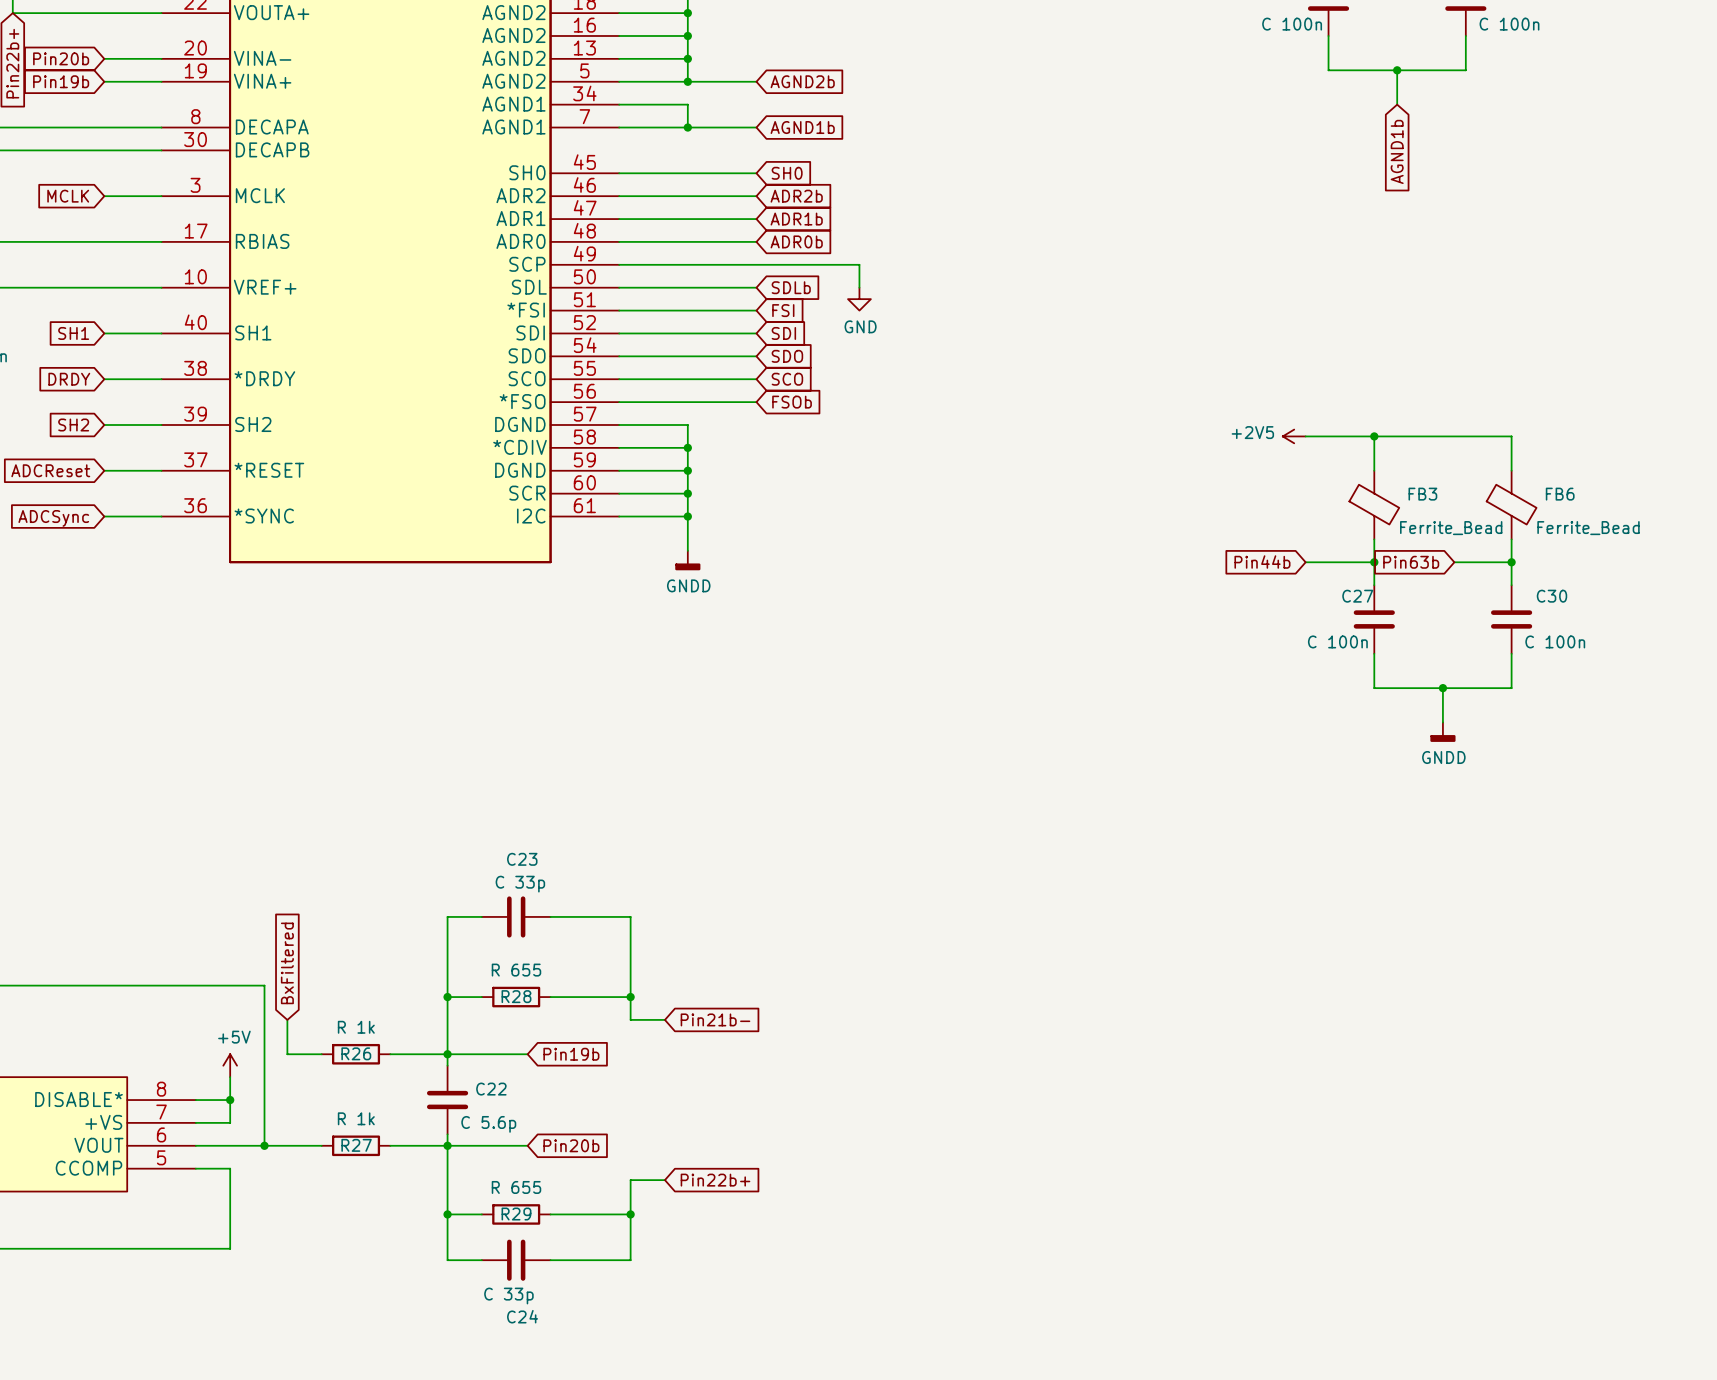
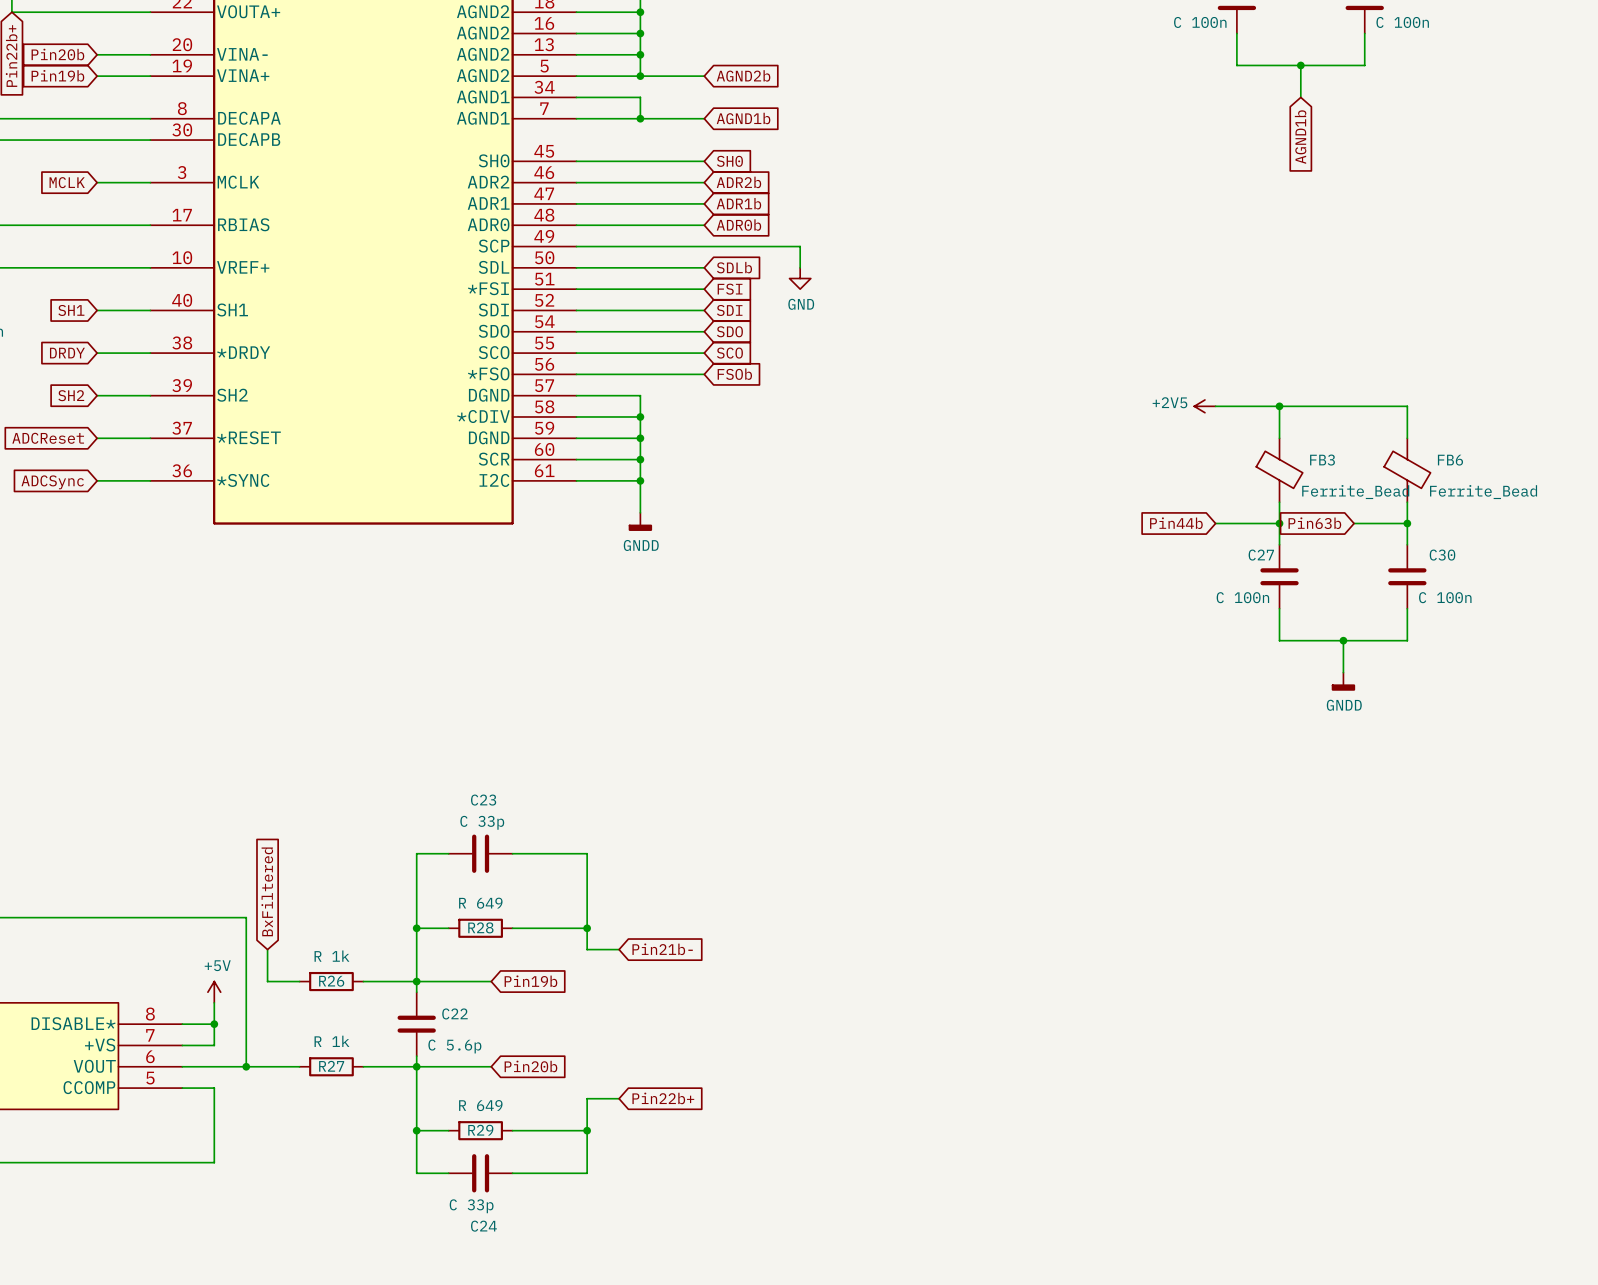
R28 value: R 655 (516, 970) -> R 649 (480, 903)
R29 value: R 655 (516, 1187) -> R 649 (480, 1105)

